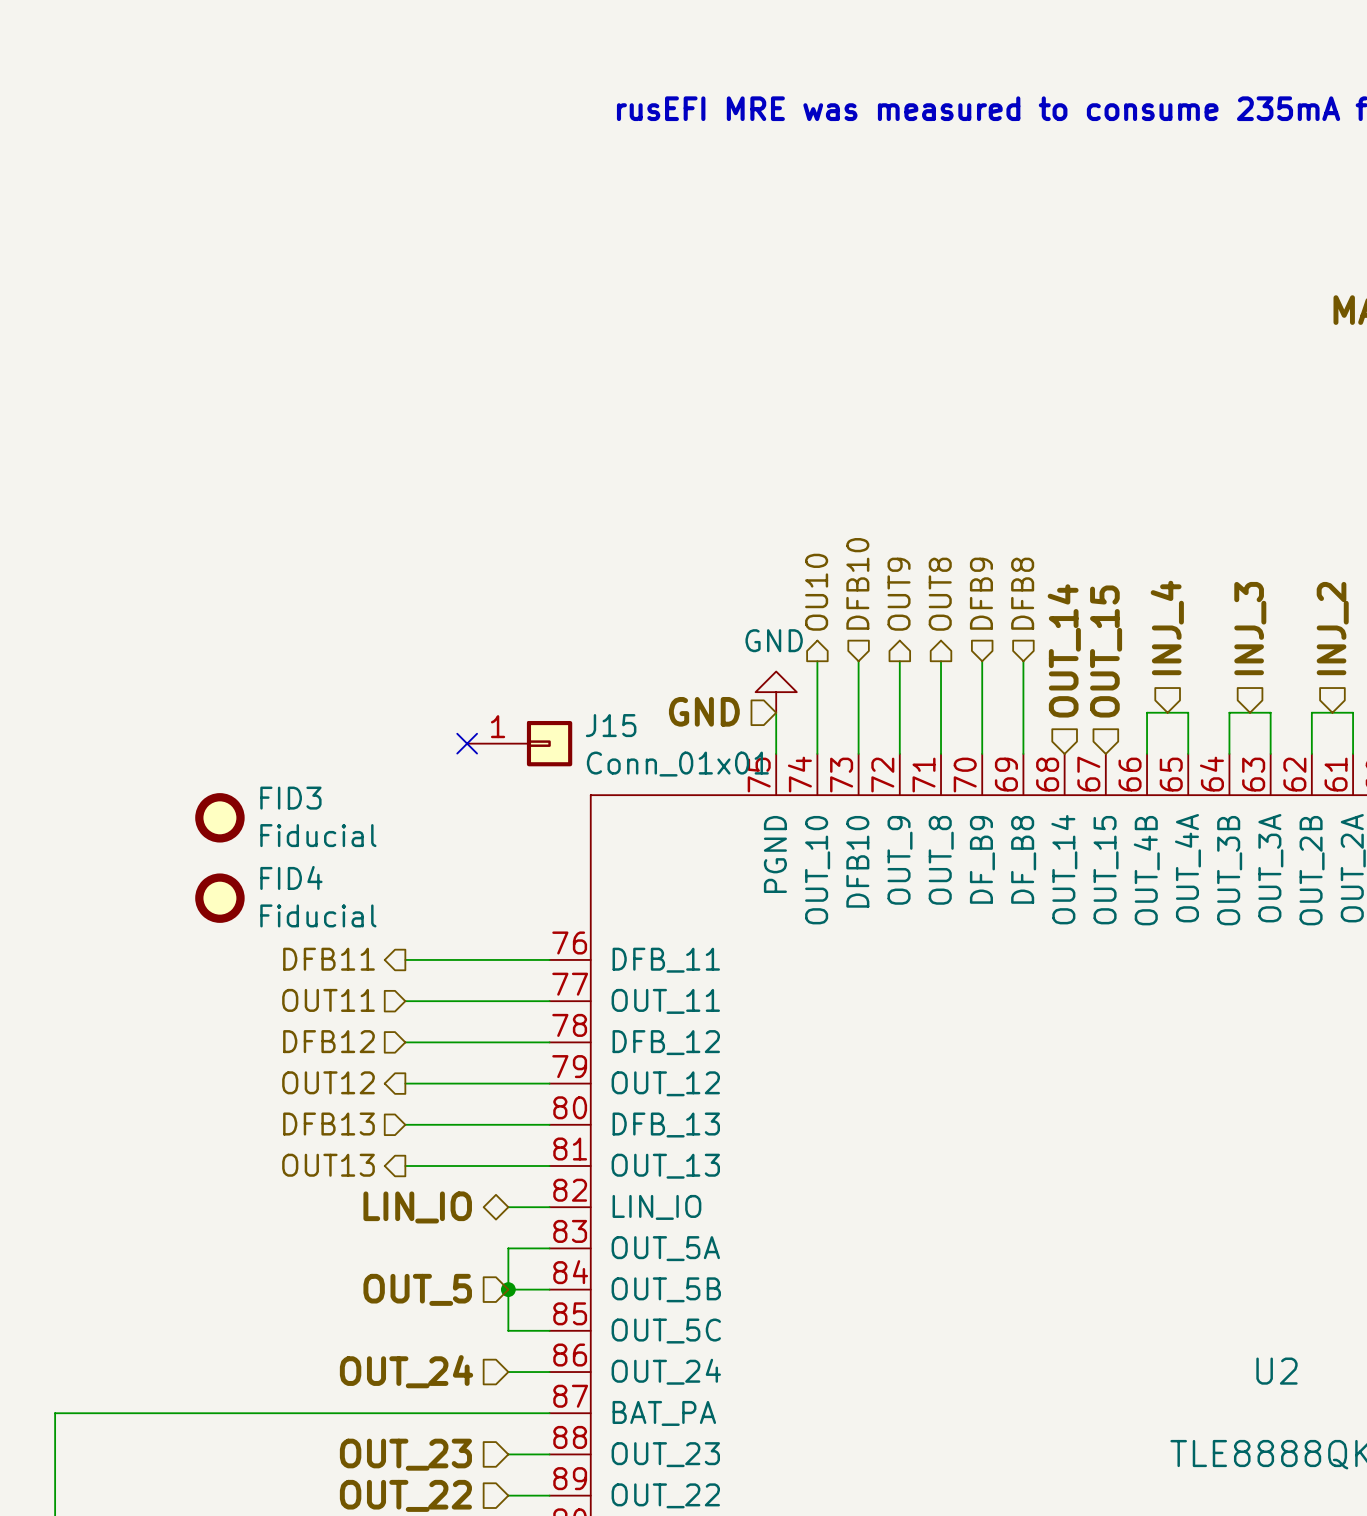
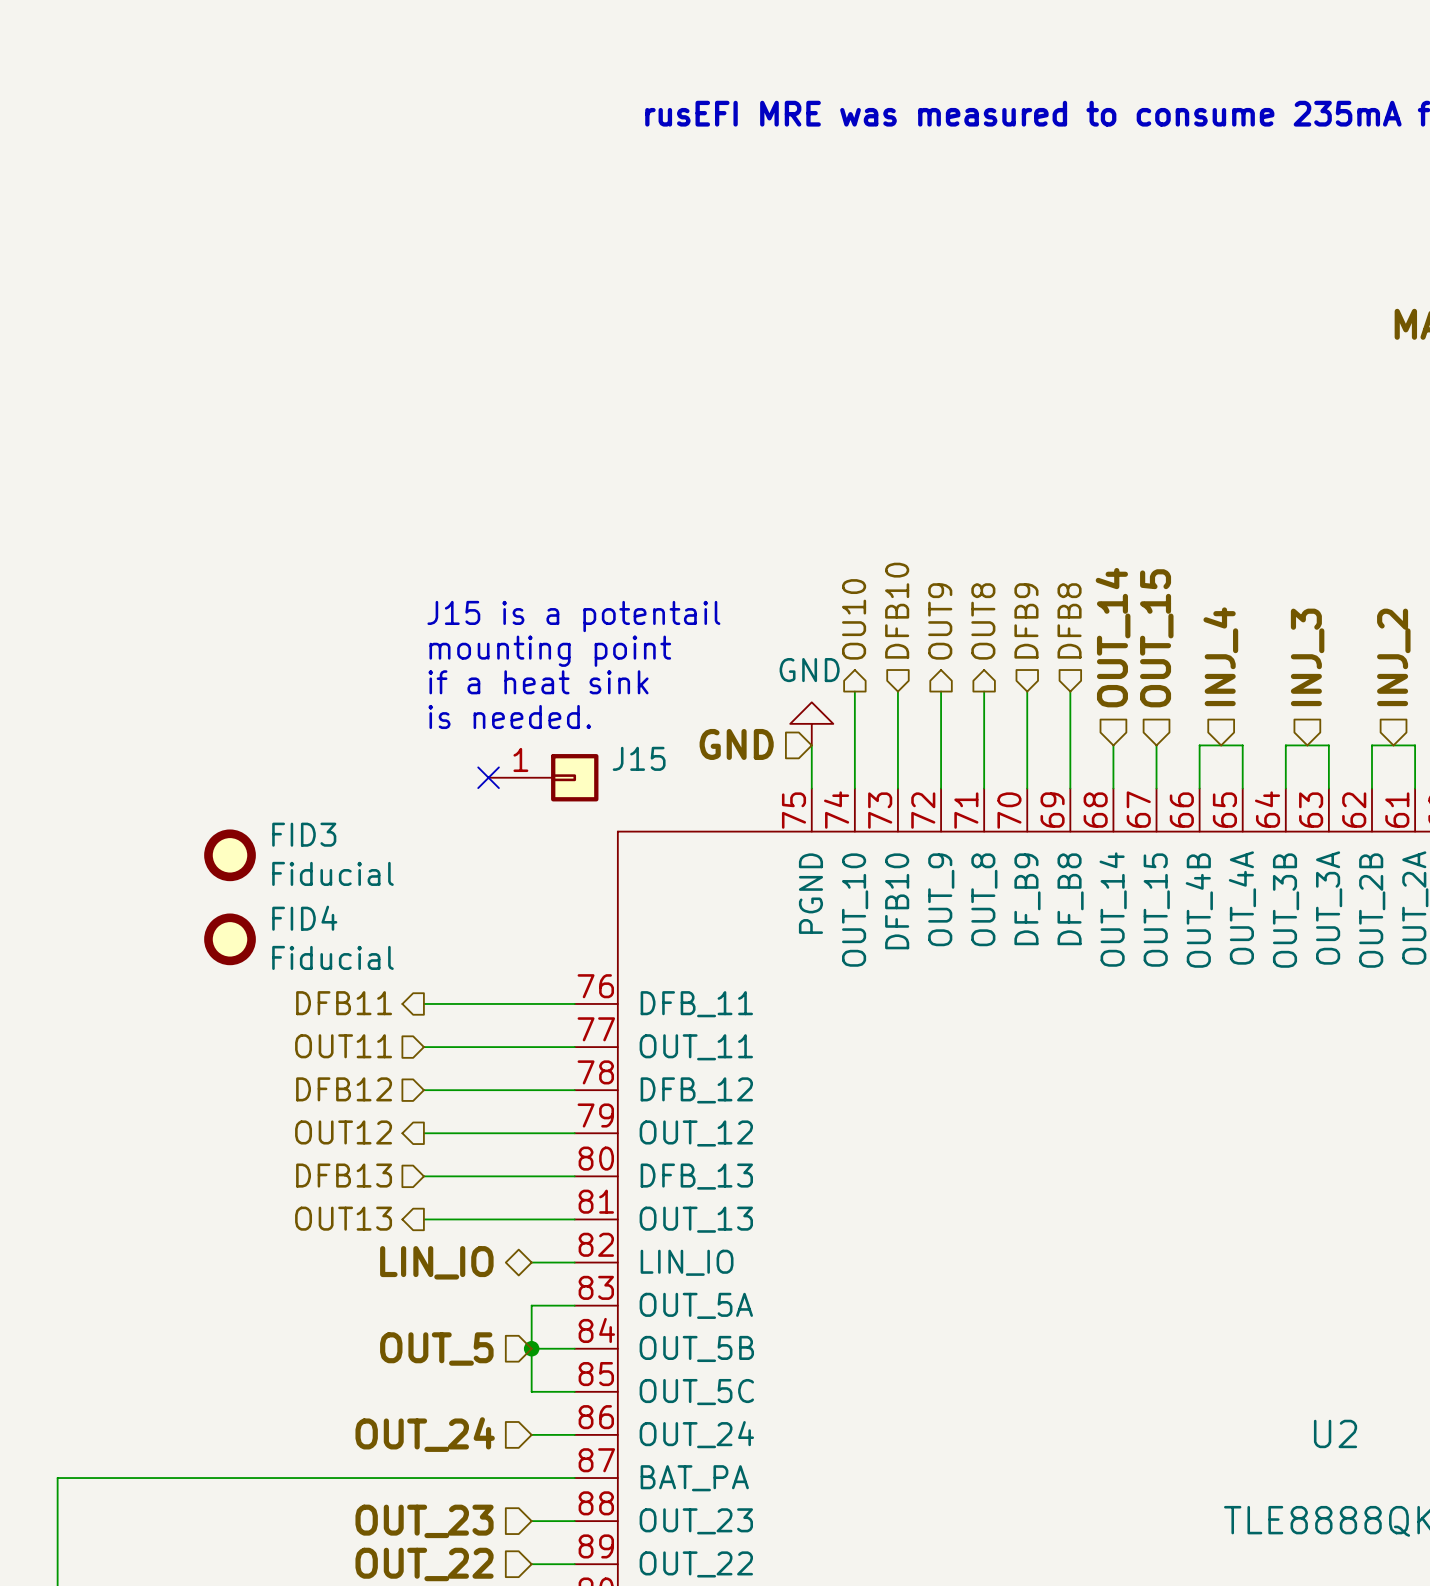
text: none -> J15 is a potentail (573, 616)
text: none -> mounting point (550, 651)
hierarchical label position: OUT_14 (1064, 650) -> OUT_14 (1113, 637)
hierarchical label position: OUT_15 (1106, 651) -> OUT_15 (1156, 638)
text: none -> if a heat sink (538, 682)
text: none -> is needed. (509, 716)
wire: none -> (1113, 745) (1113, 788)
wire: none -> (1156, 745) (1156, 788)
J15 value: Conn_01x01 (677, 764) -> none

